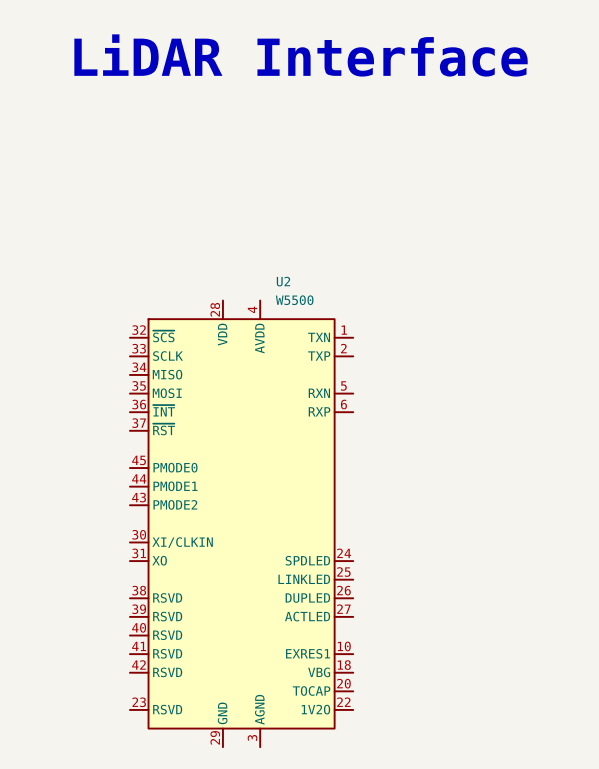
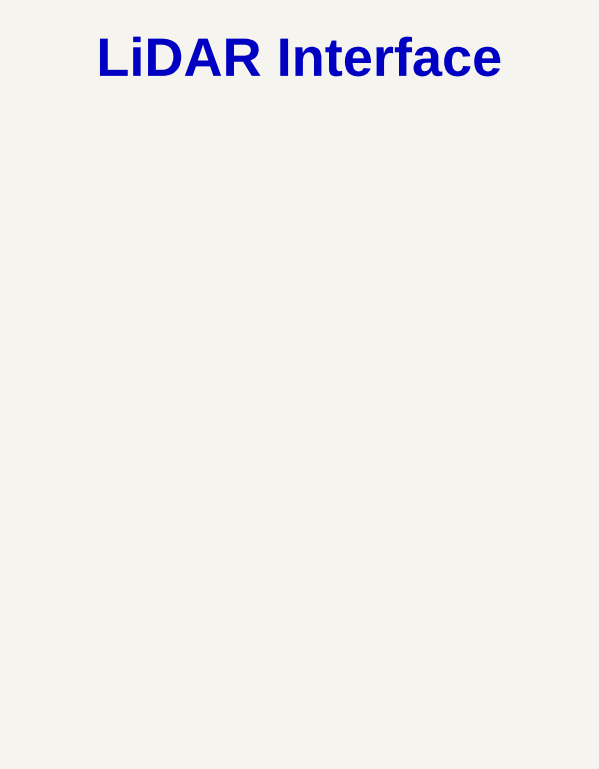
U2: W5500 (241, 523) -> none

